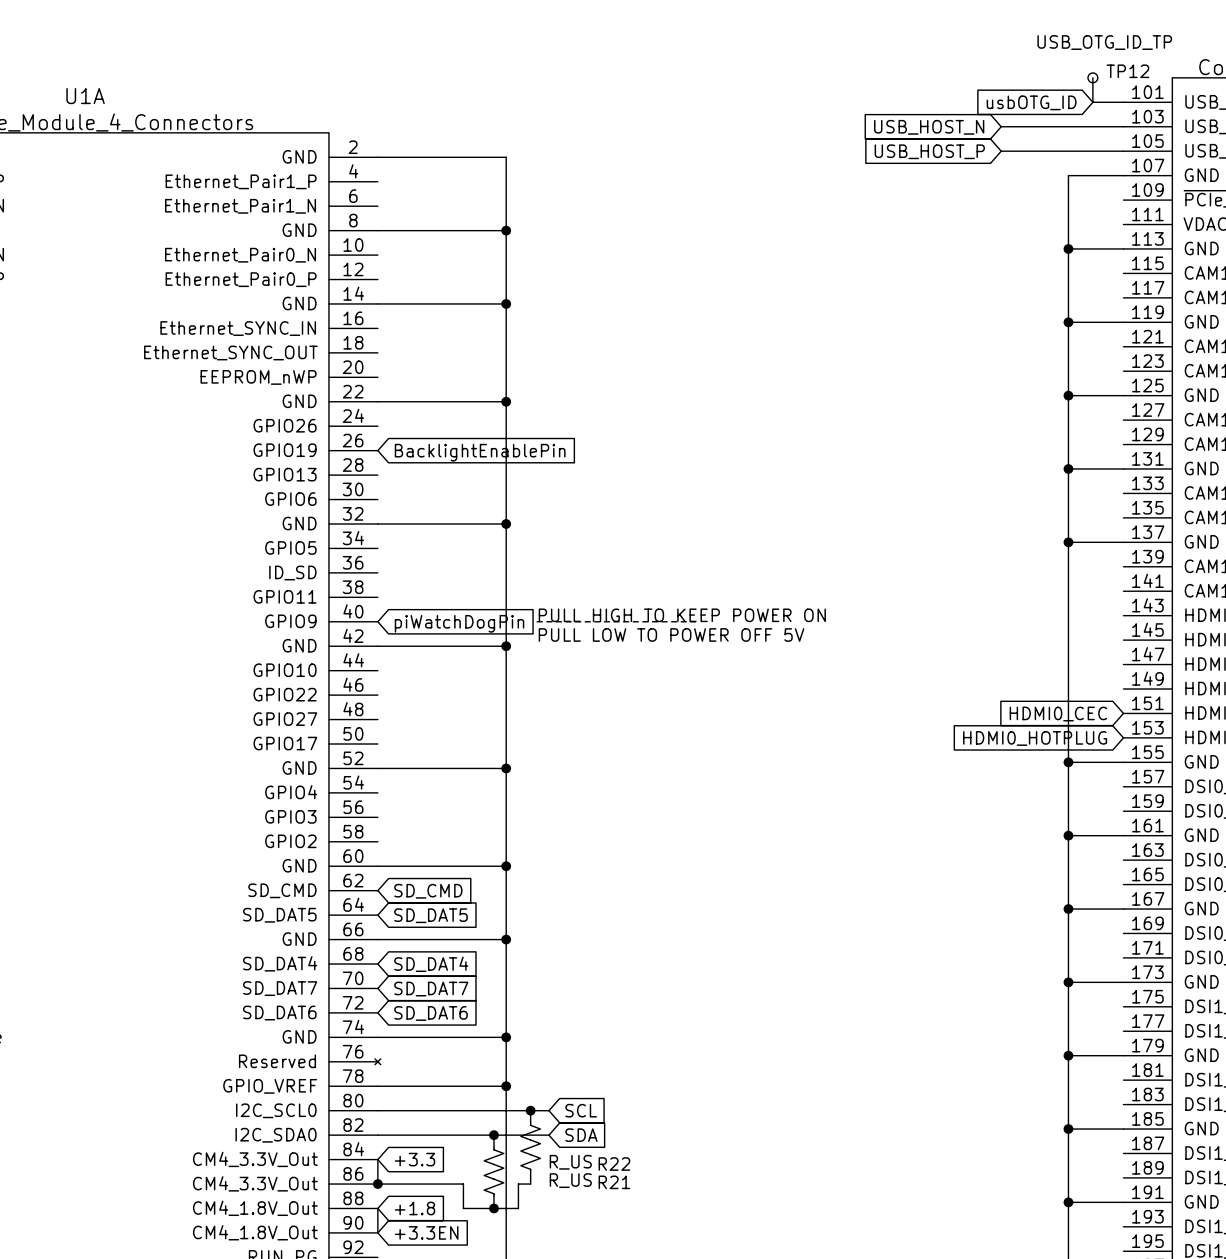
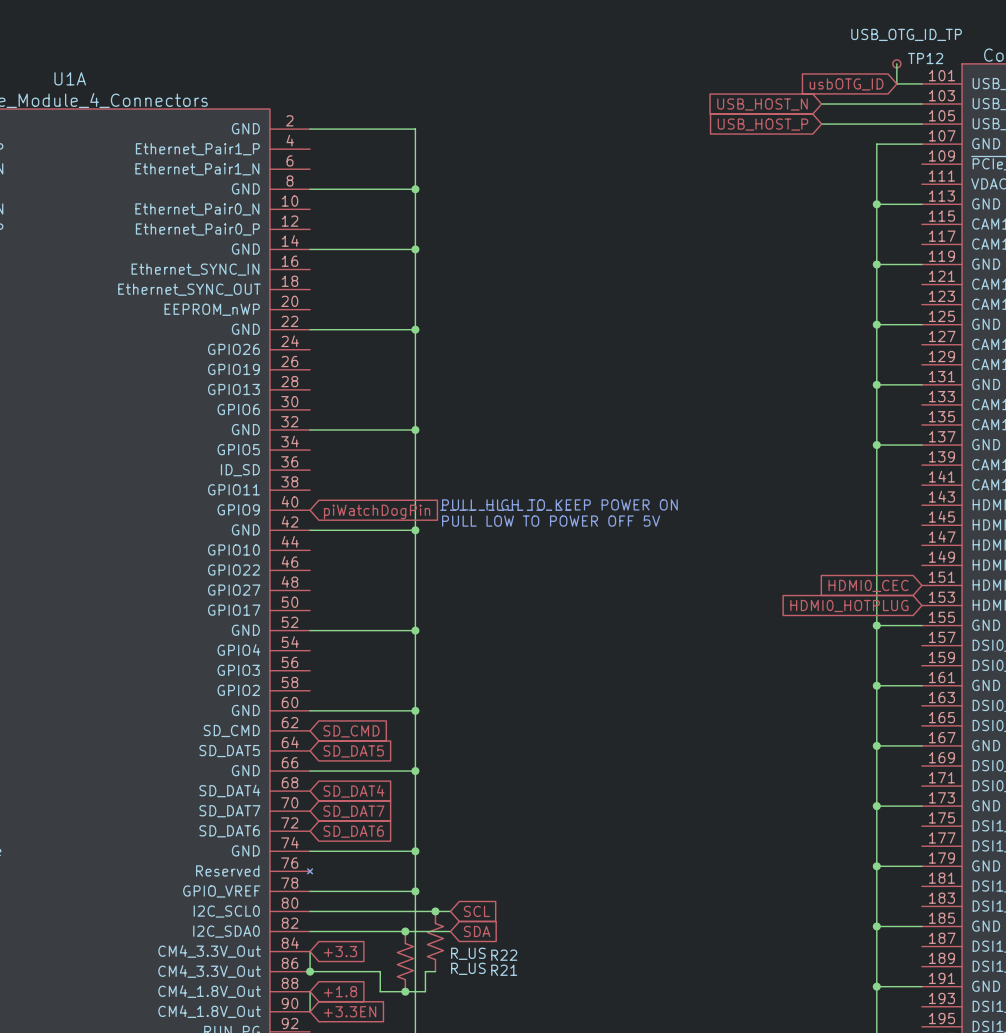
global label: BacklightEnablePin (480, 452) -> none

